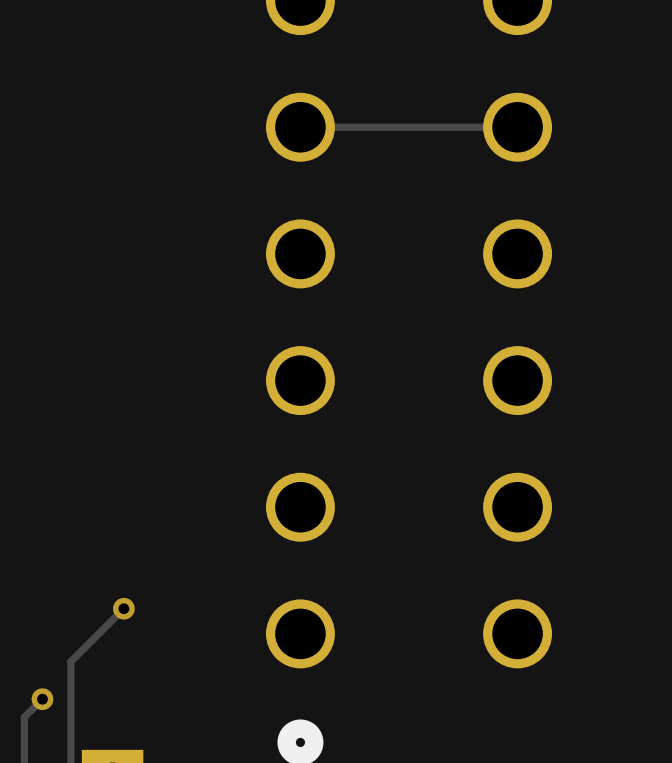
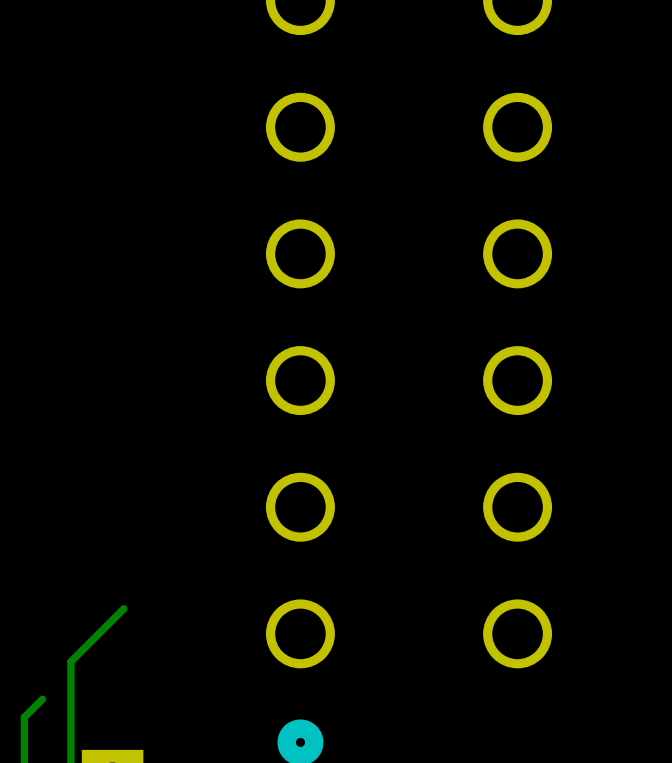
track: (517, 127) (300, 127) -> none
via: (123, 608) -> none
via: (42, 699) -> none

